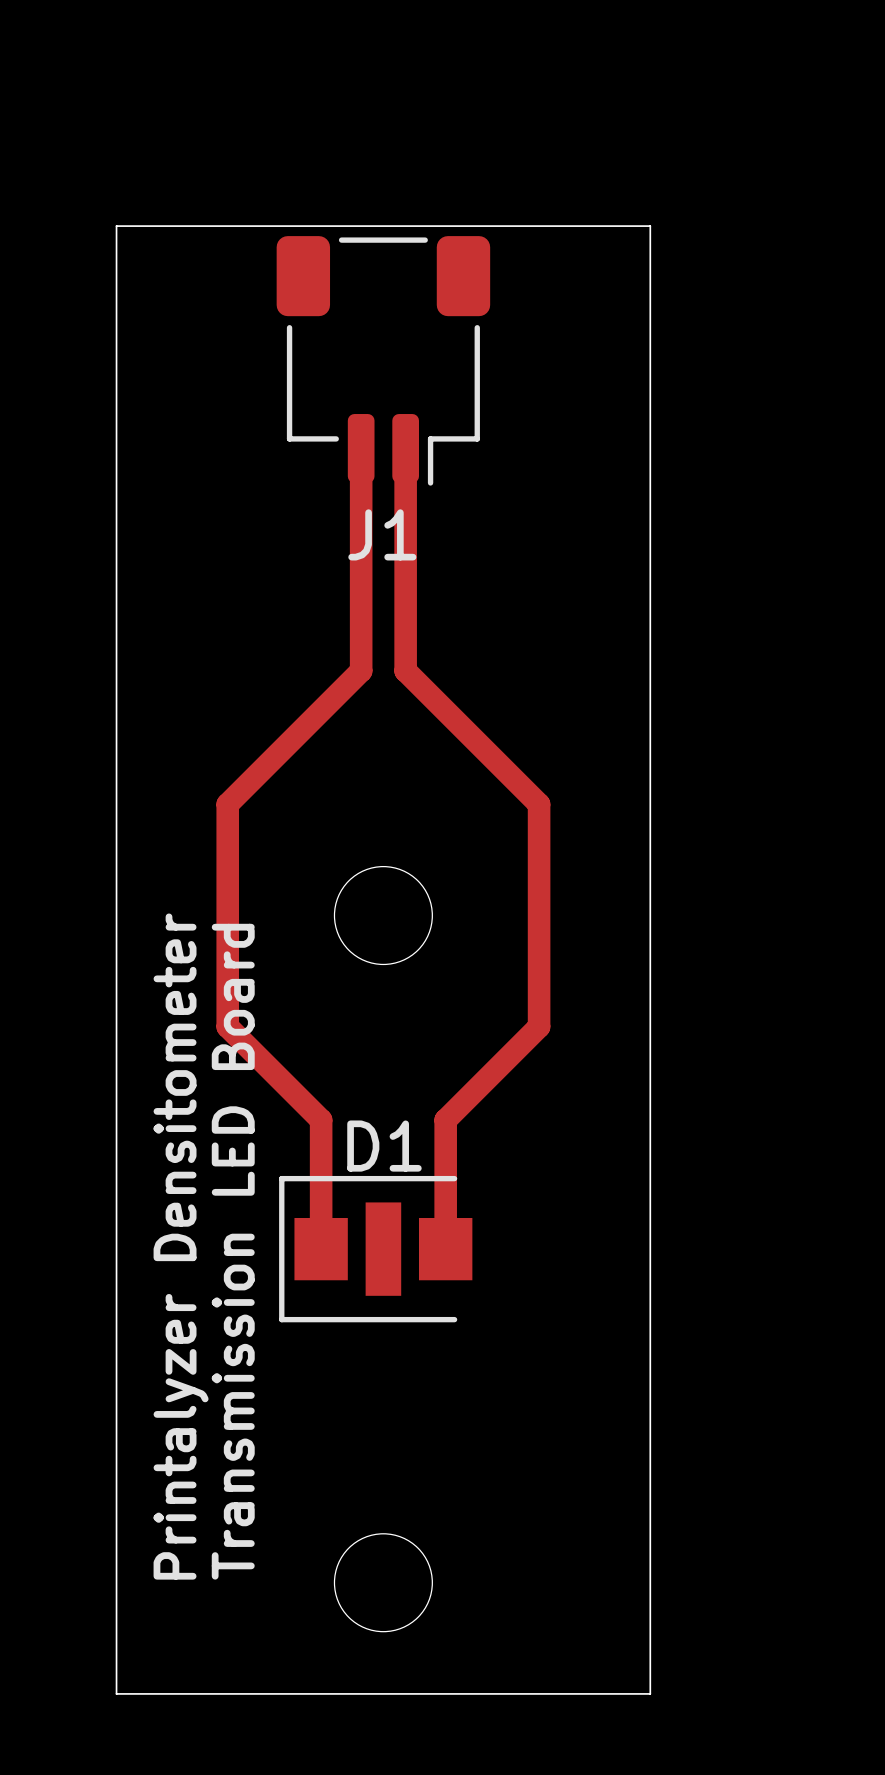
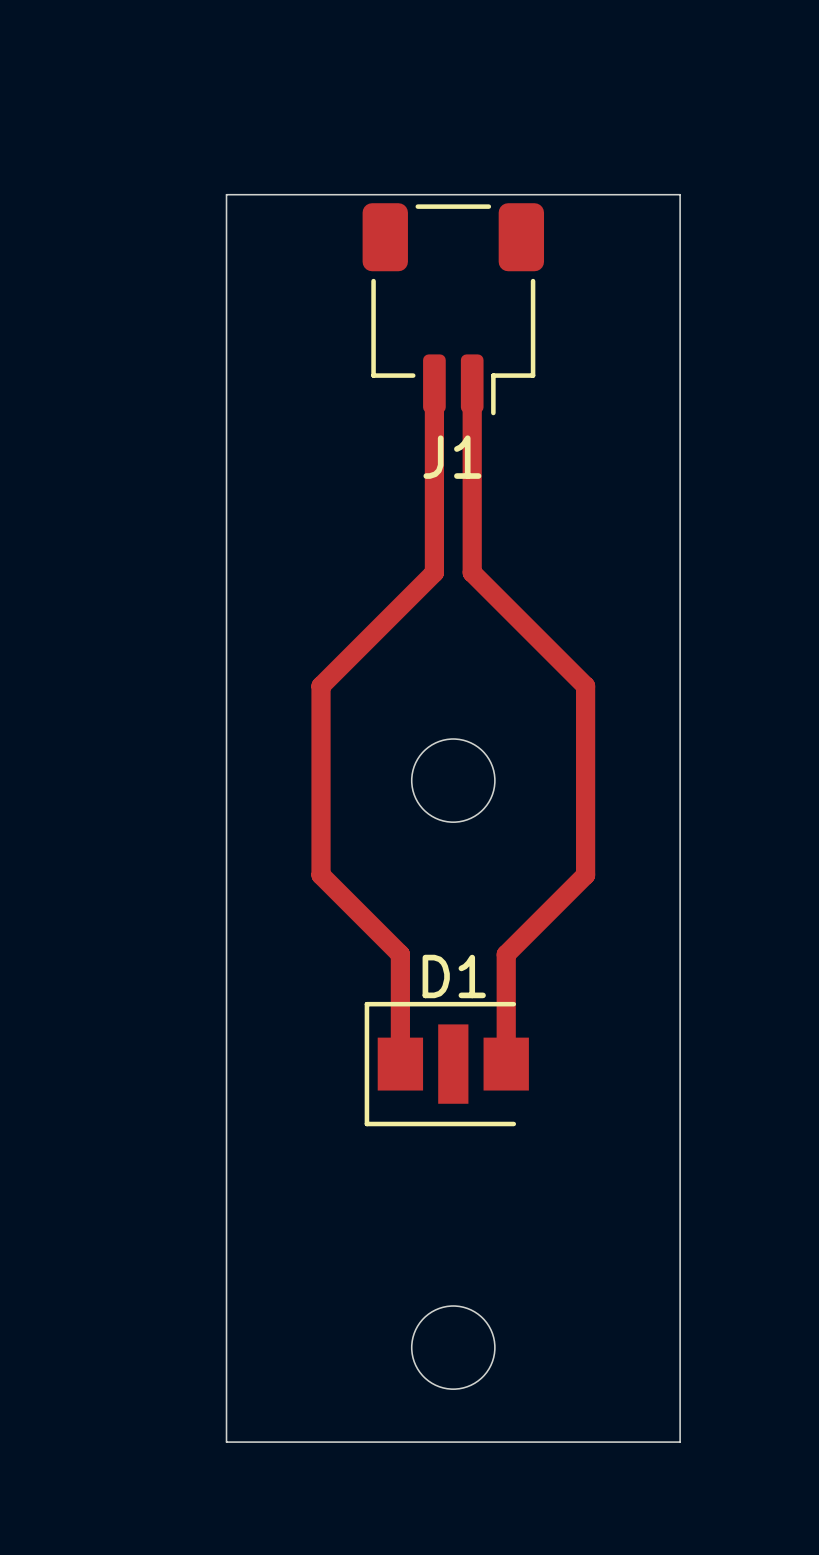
text: Printalyzer Densitometer (181, 1246) -> none
text: Transmission LED Board (233, 1251) -> none

